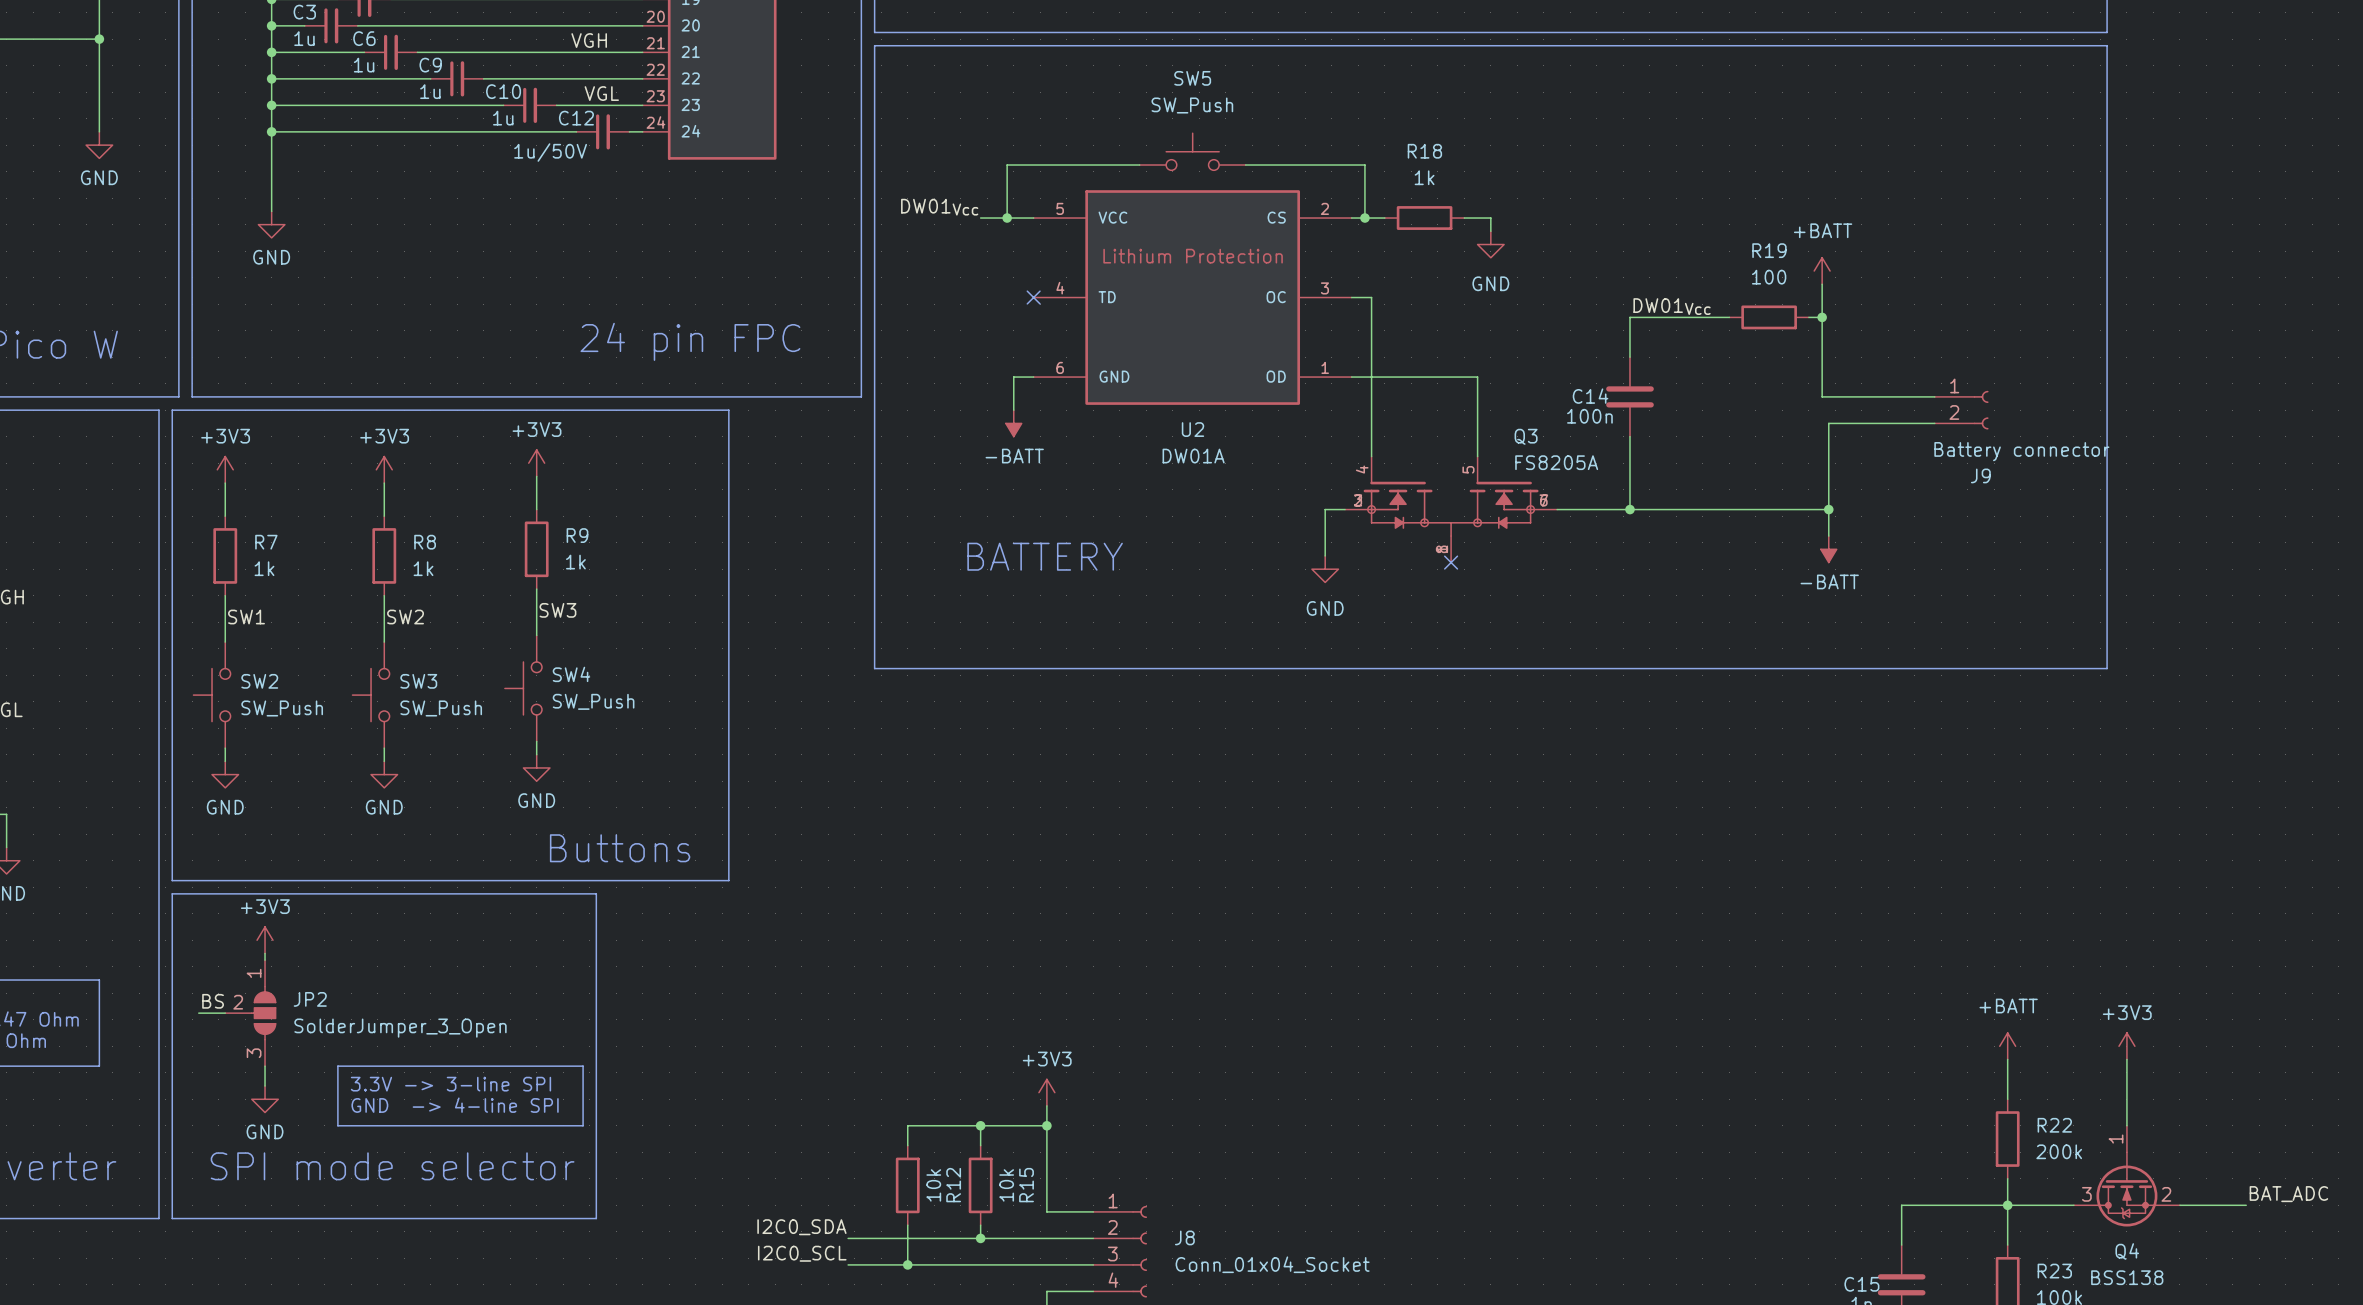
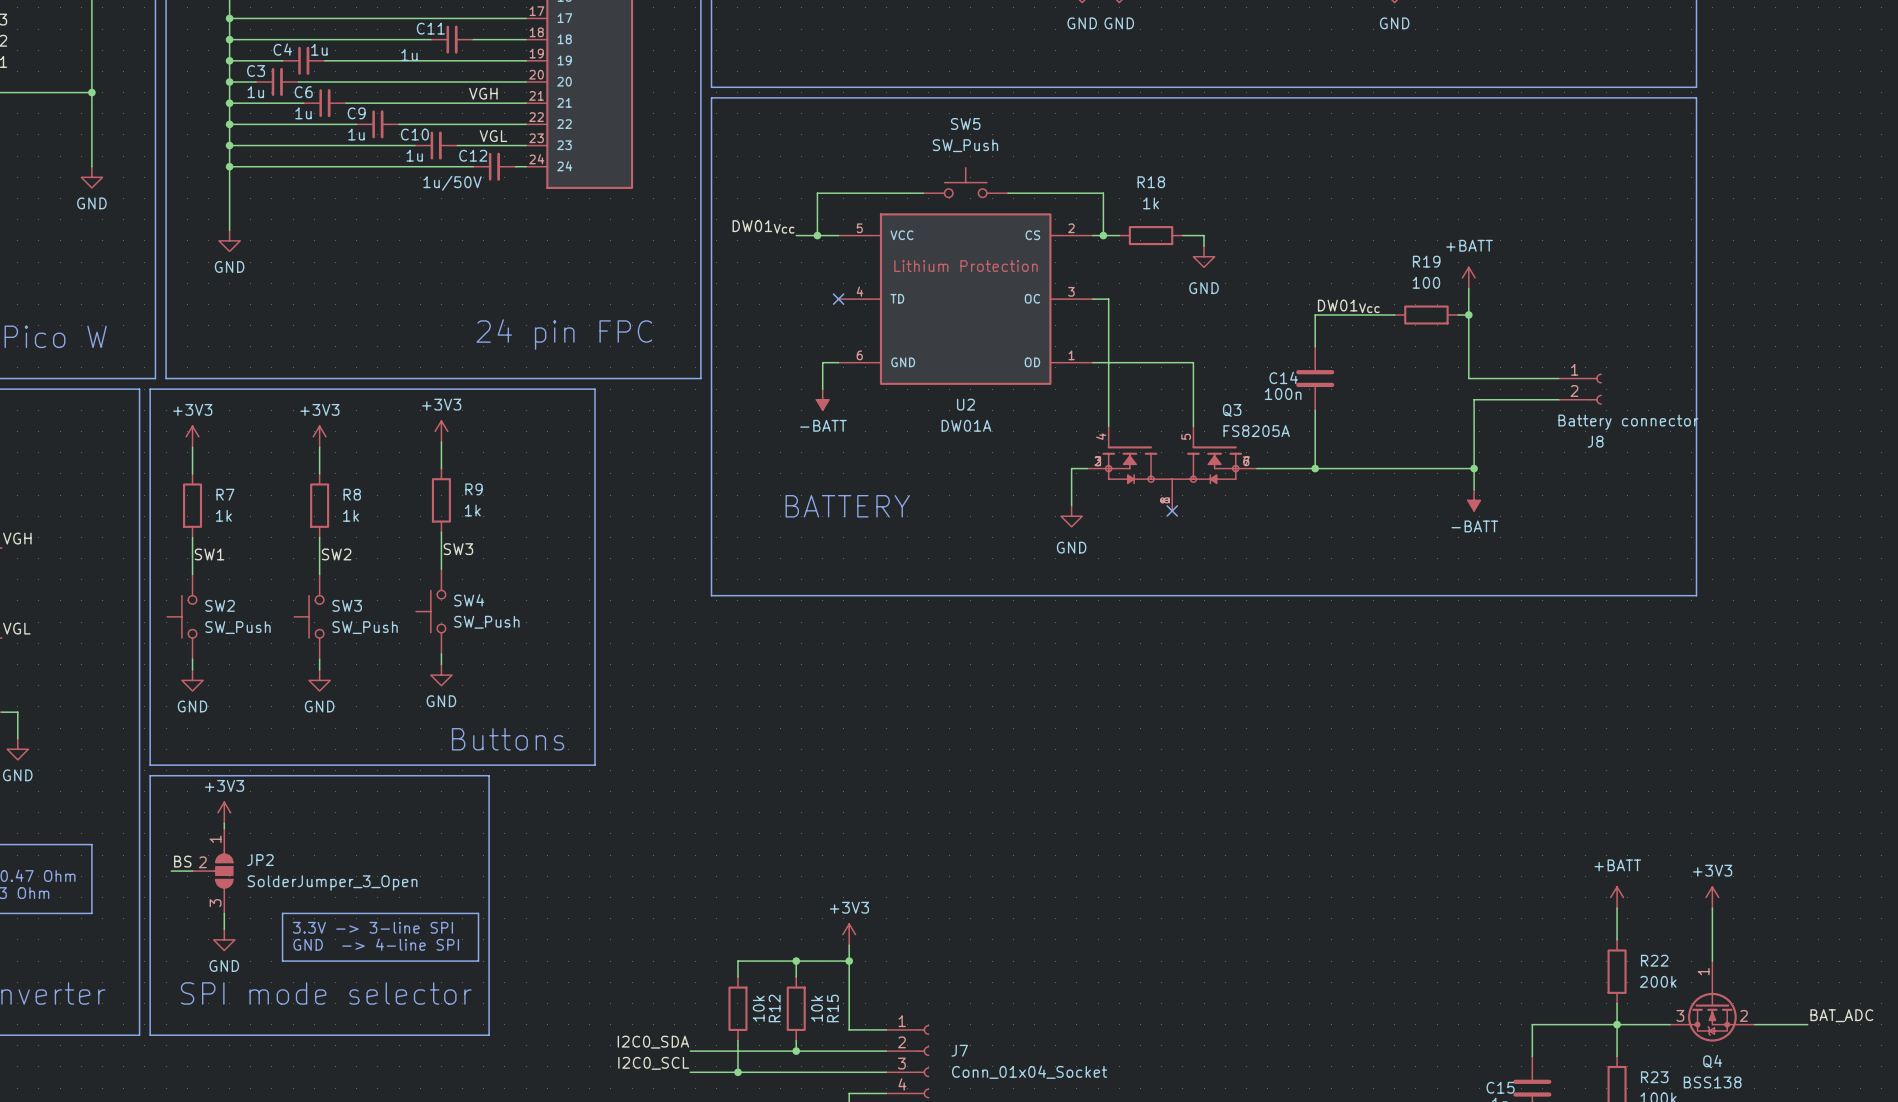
J9 name: J9 (1980, 475) -> J8 (1595, 441)
J8 name: J8 (1184, 1237) -> J7 (959, 1050)

